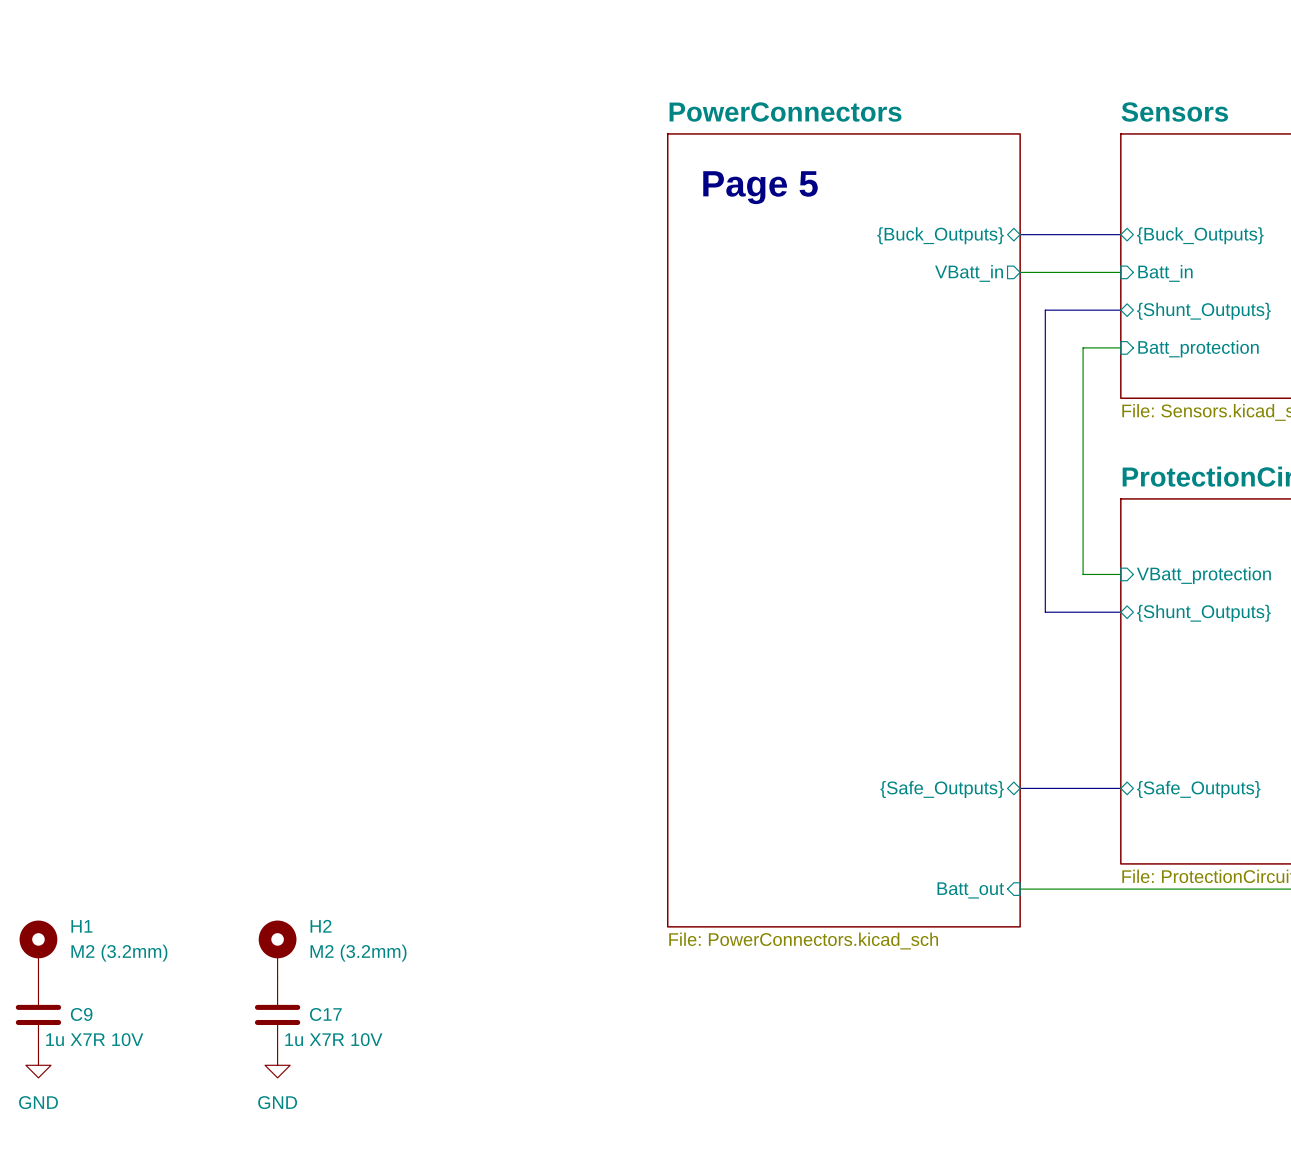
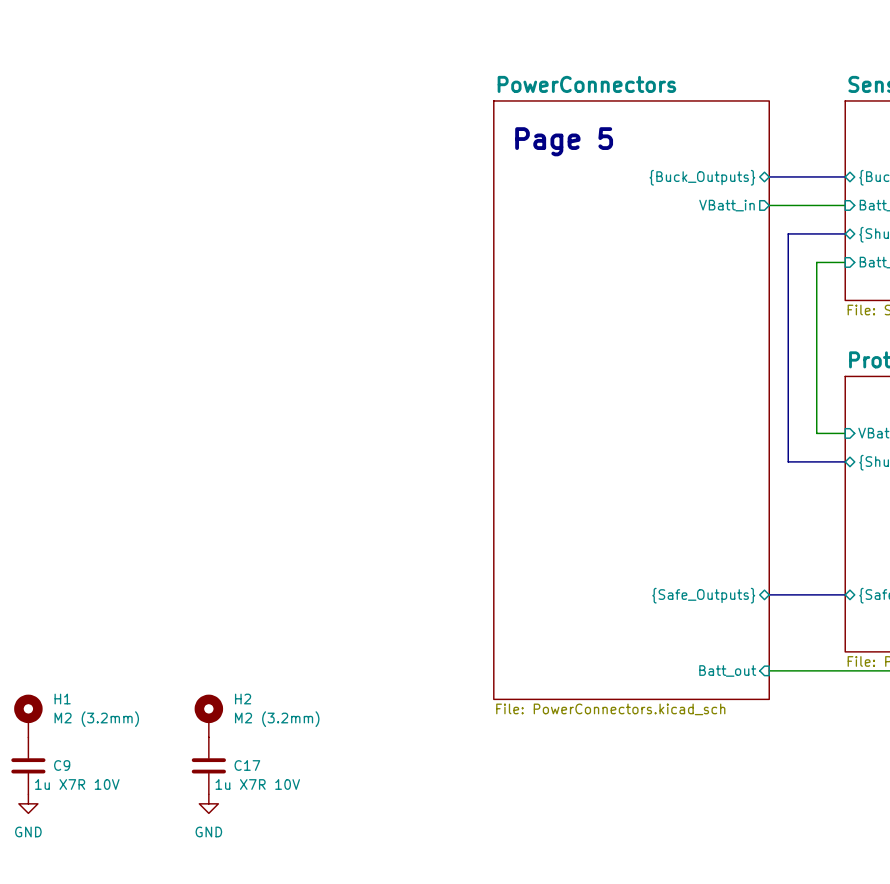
sheet PowerConnectors shape: [666, 133, 1021, 928] -> [493, 100, 770, 700]

